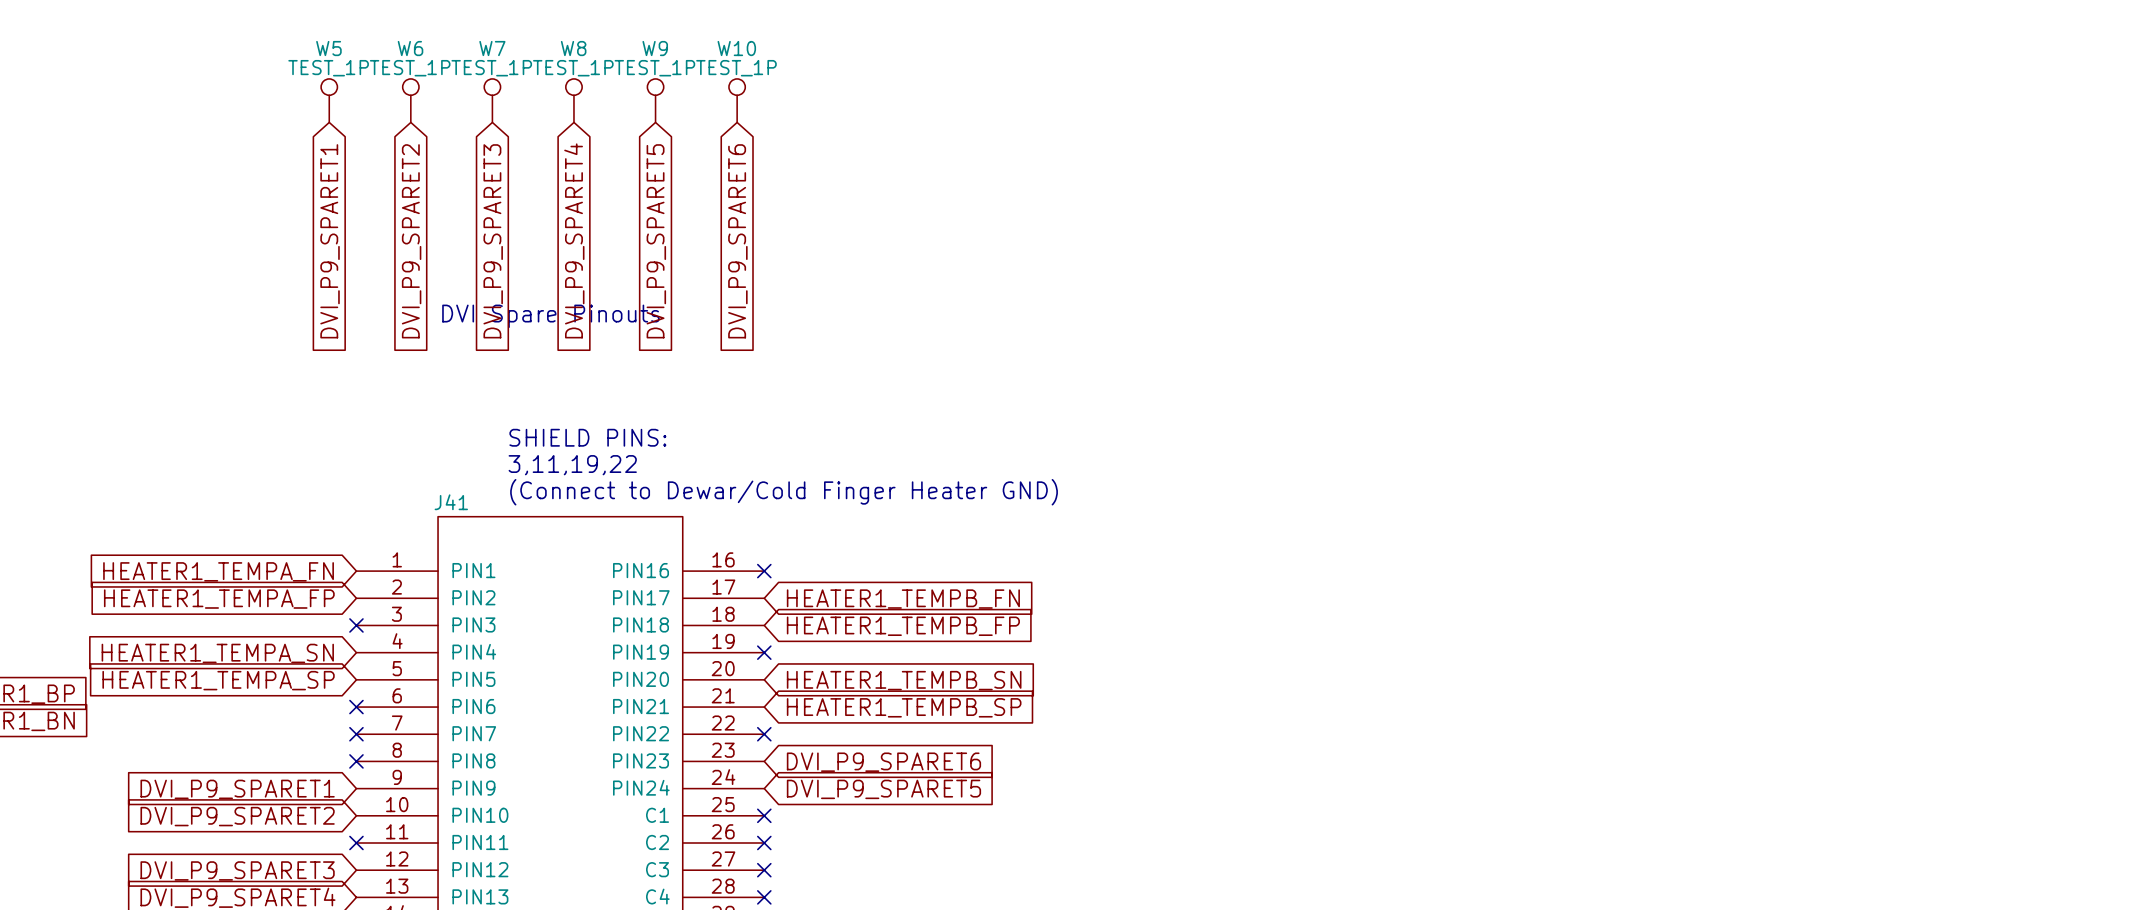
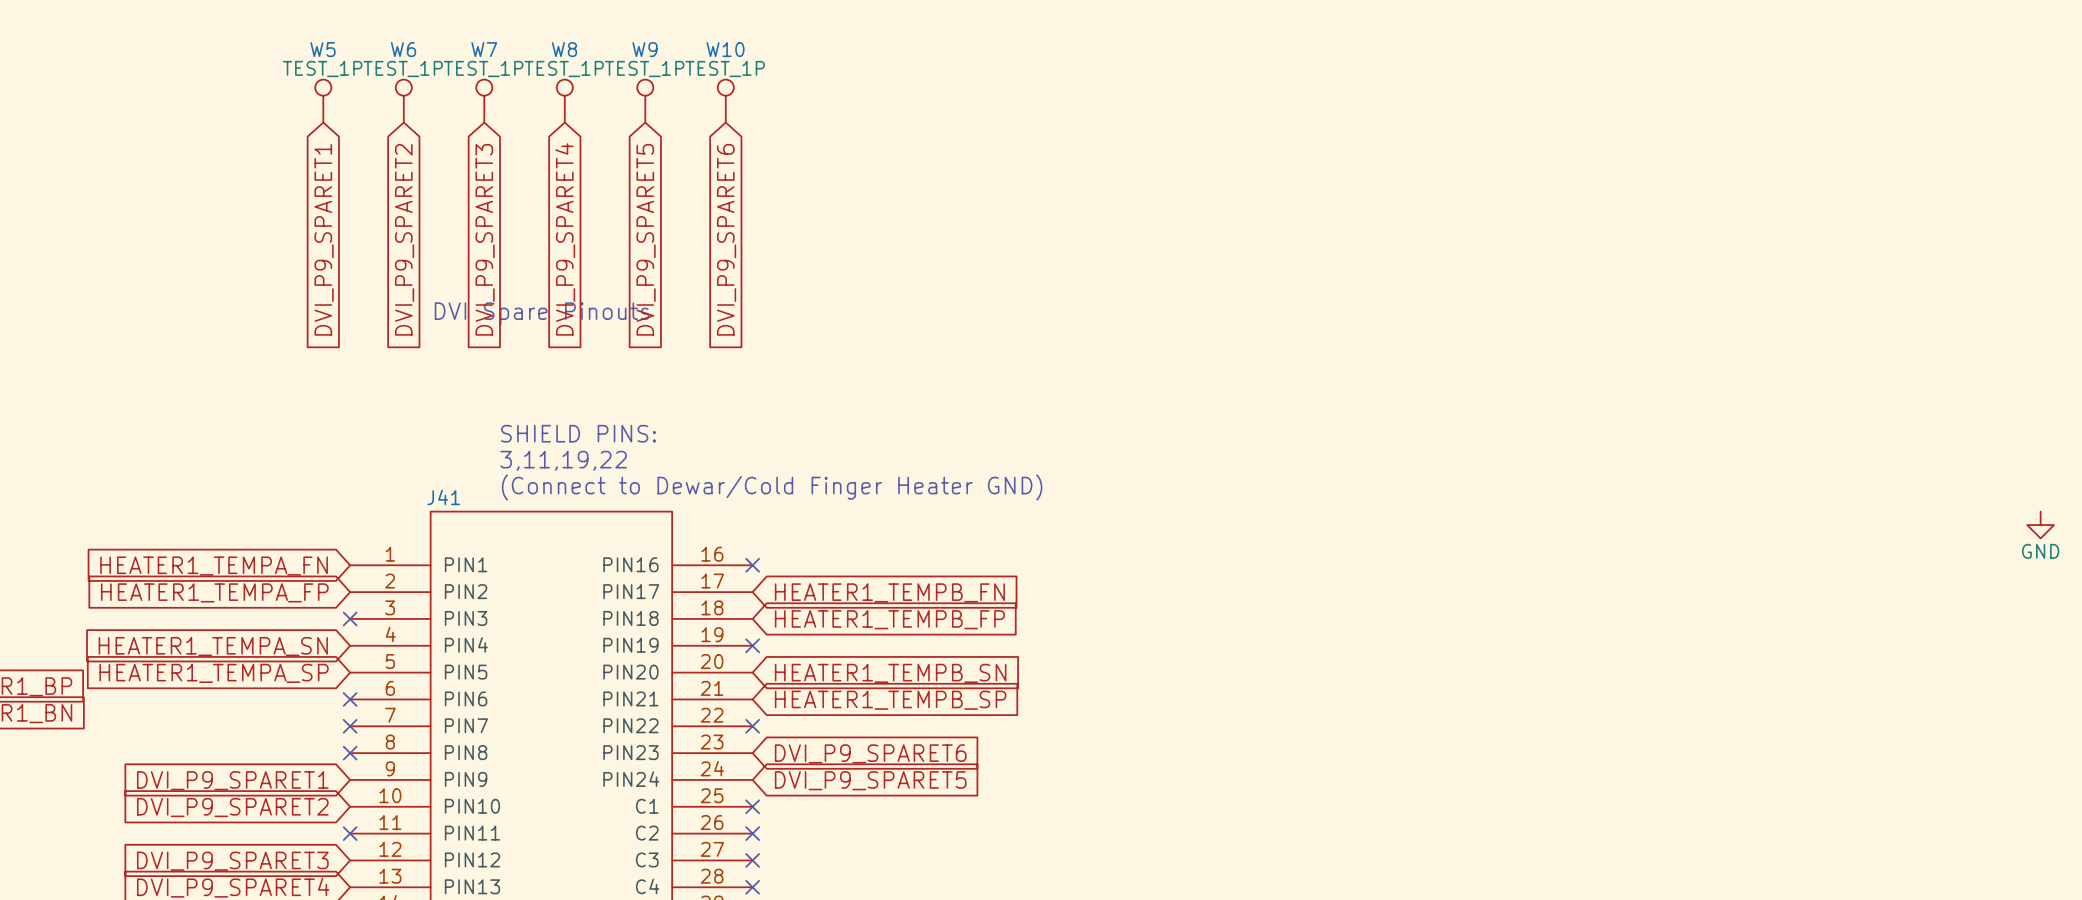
power symbol: none -> GND (2040, 525)

